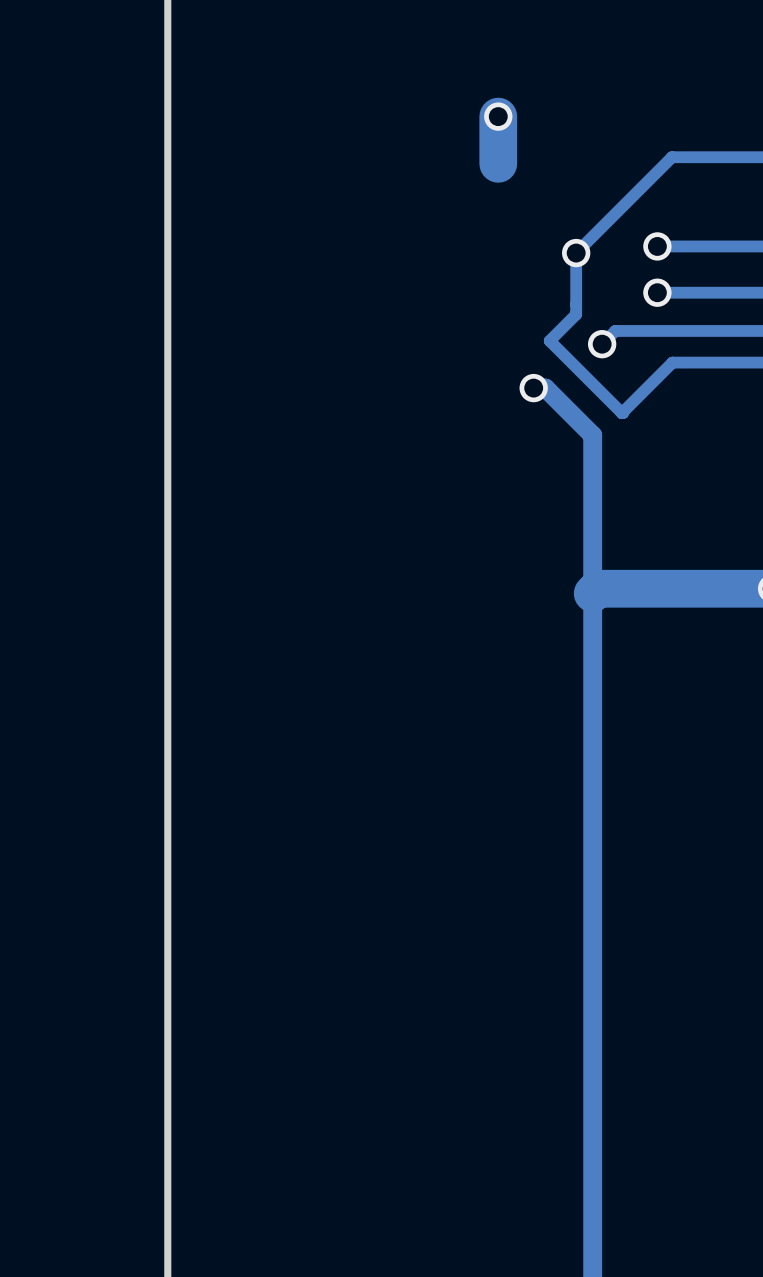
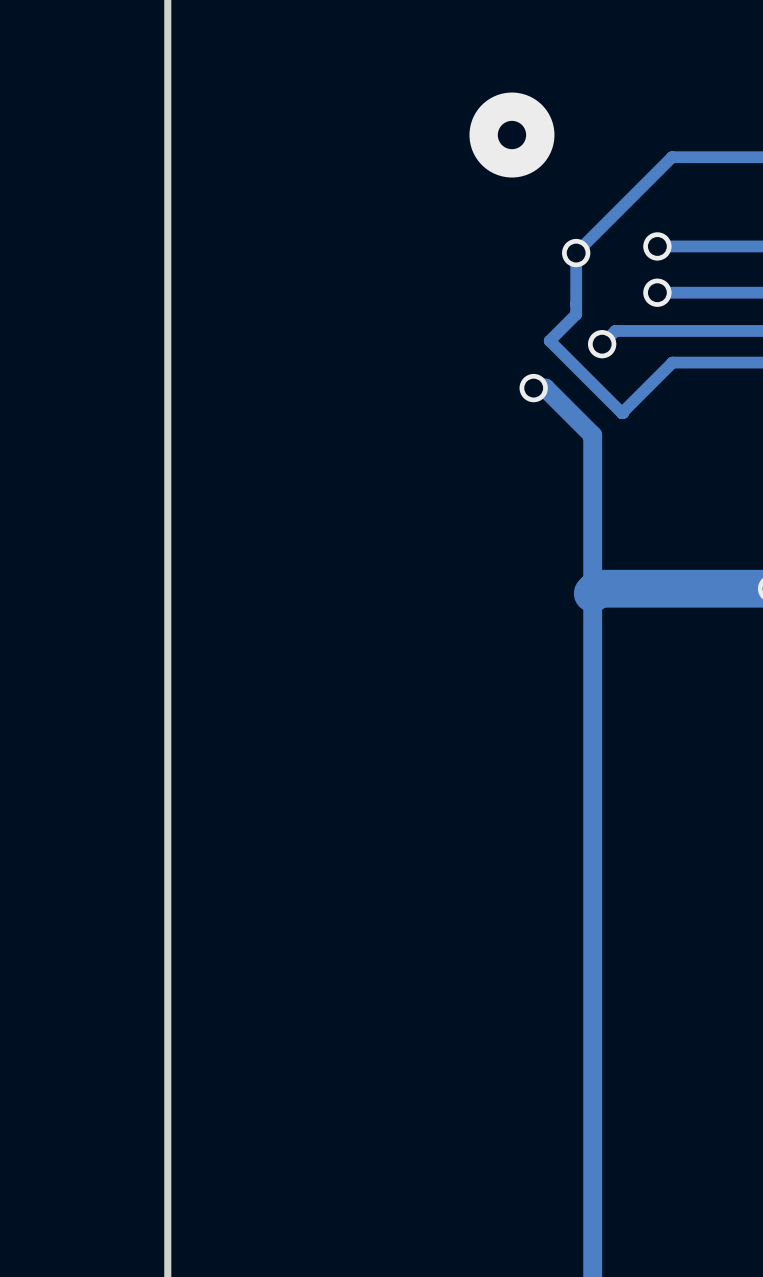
via size: [484, 102, 513, 131] -> [469, 92, 555, 178]
track: (498, 116) (498, 163) -> none

